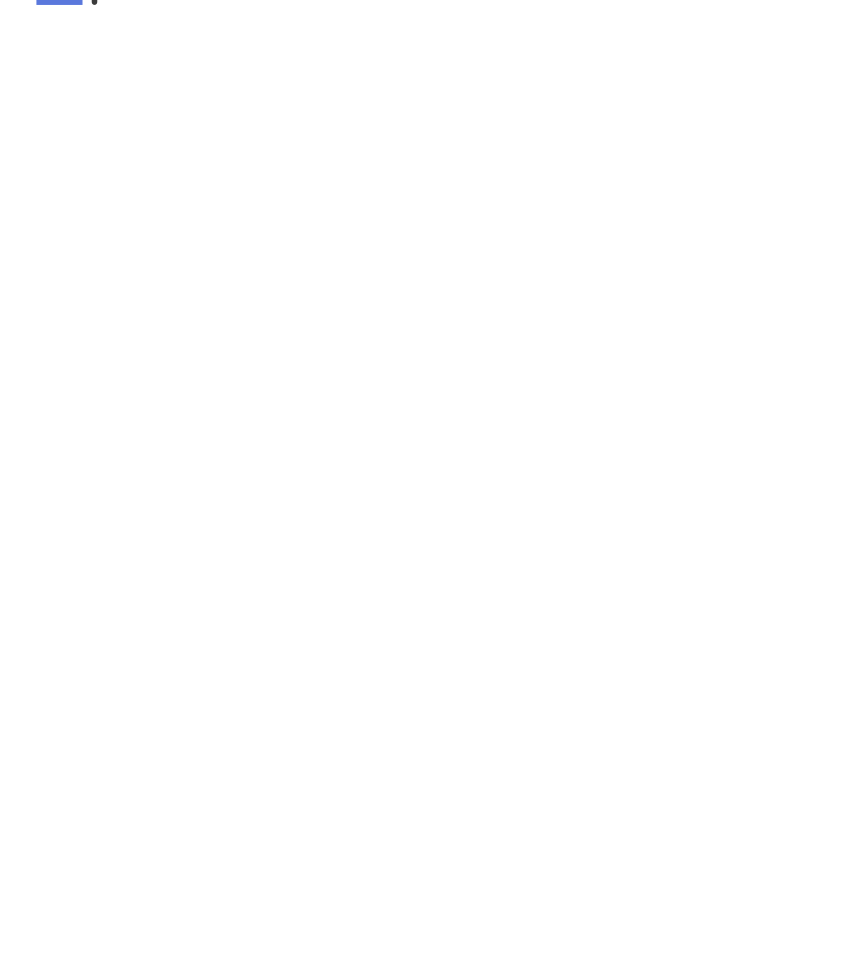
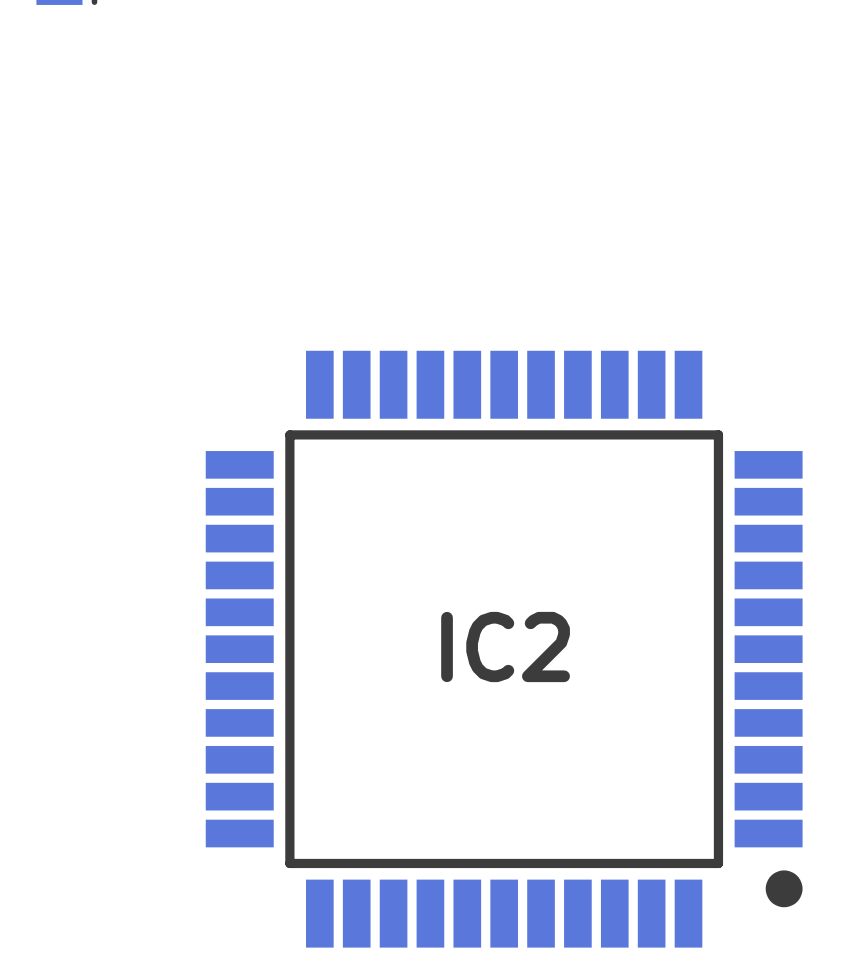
IC2: none -> (504, 649)

